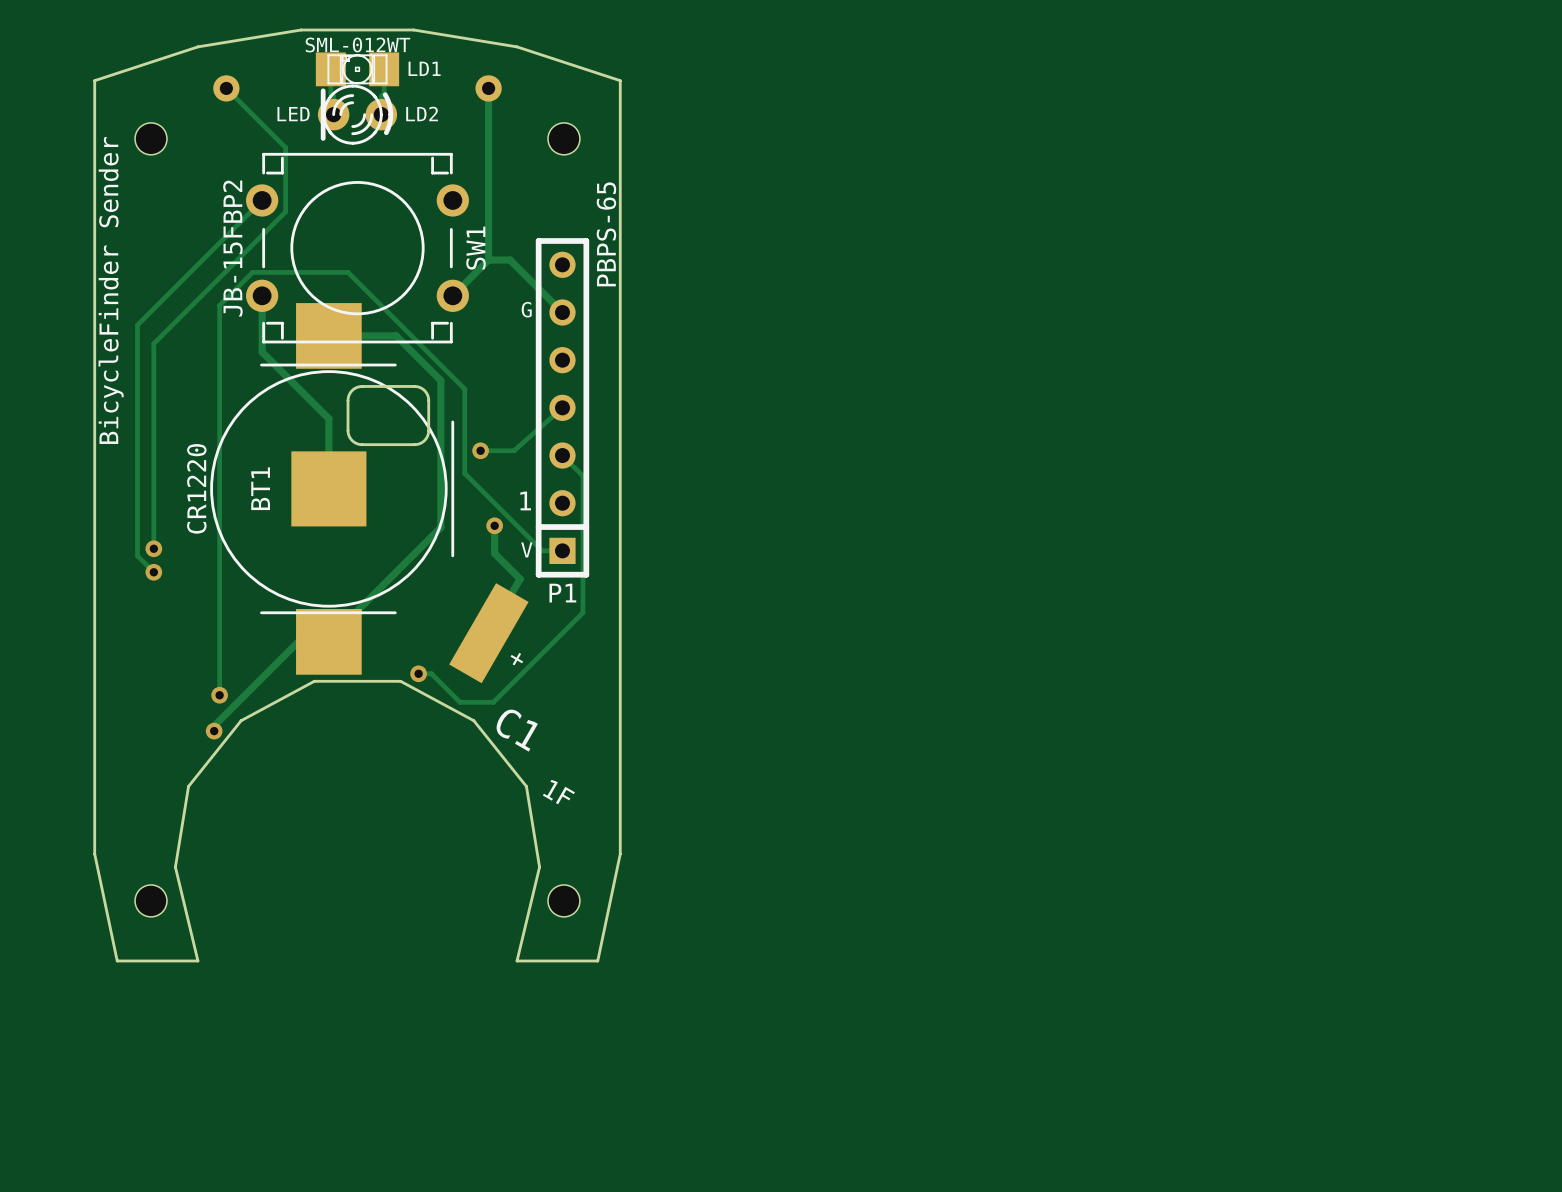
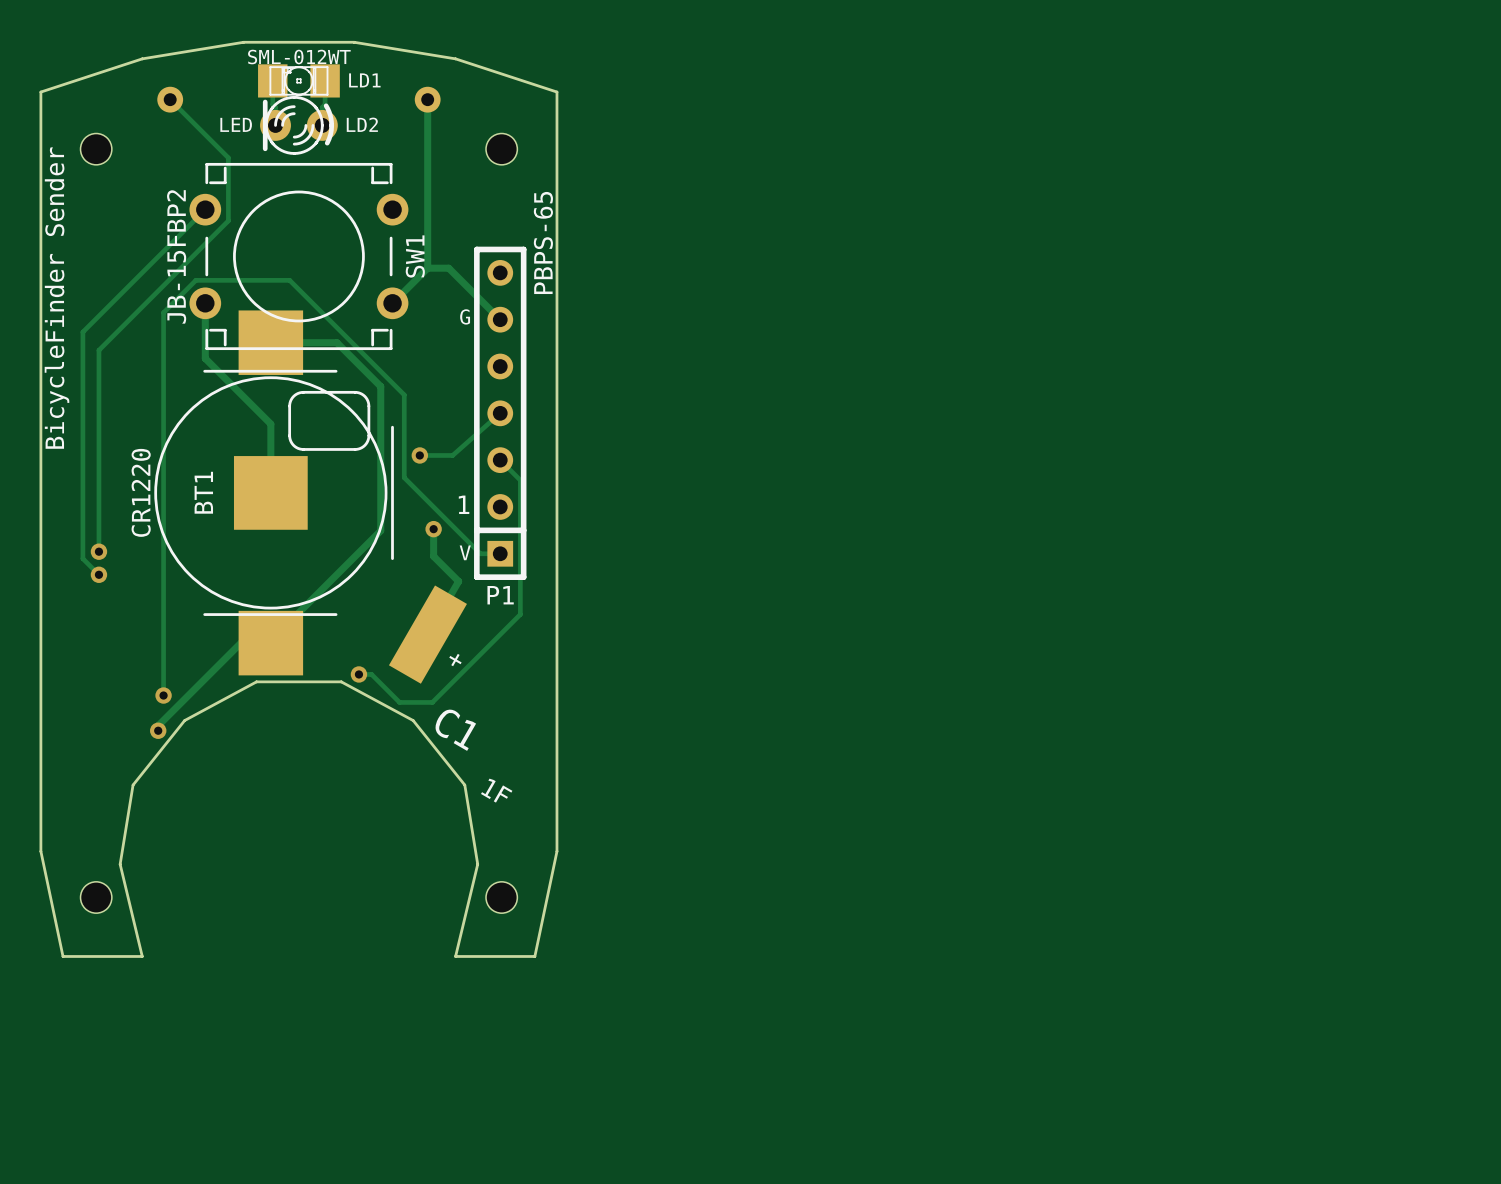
part footprint: [346, 385, 431, 447] -> [288, 390, 371, 451]

